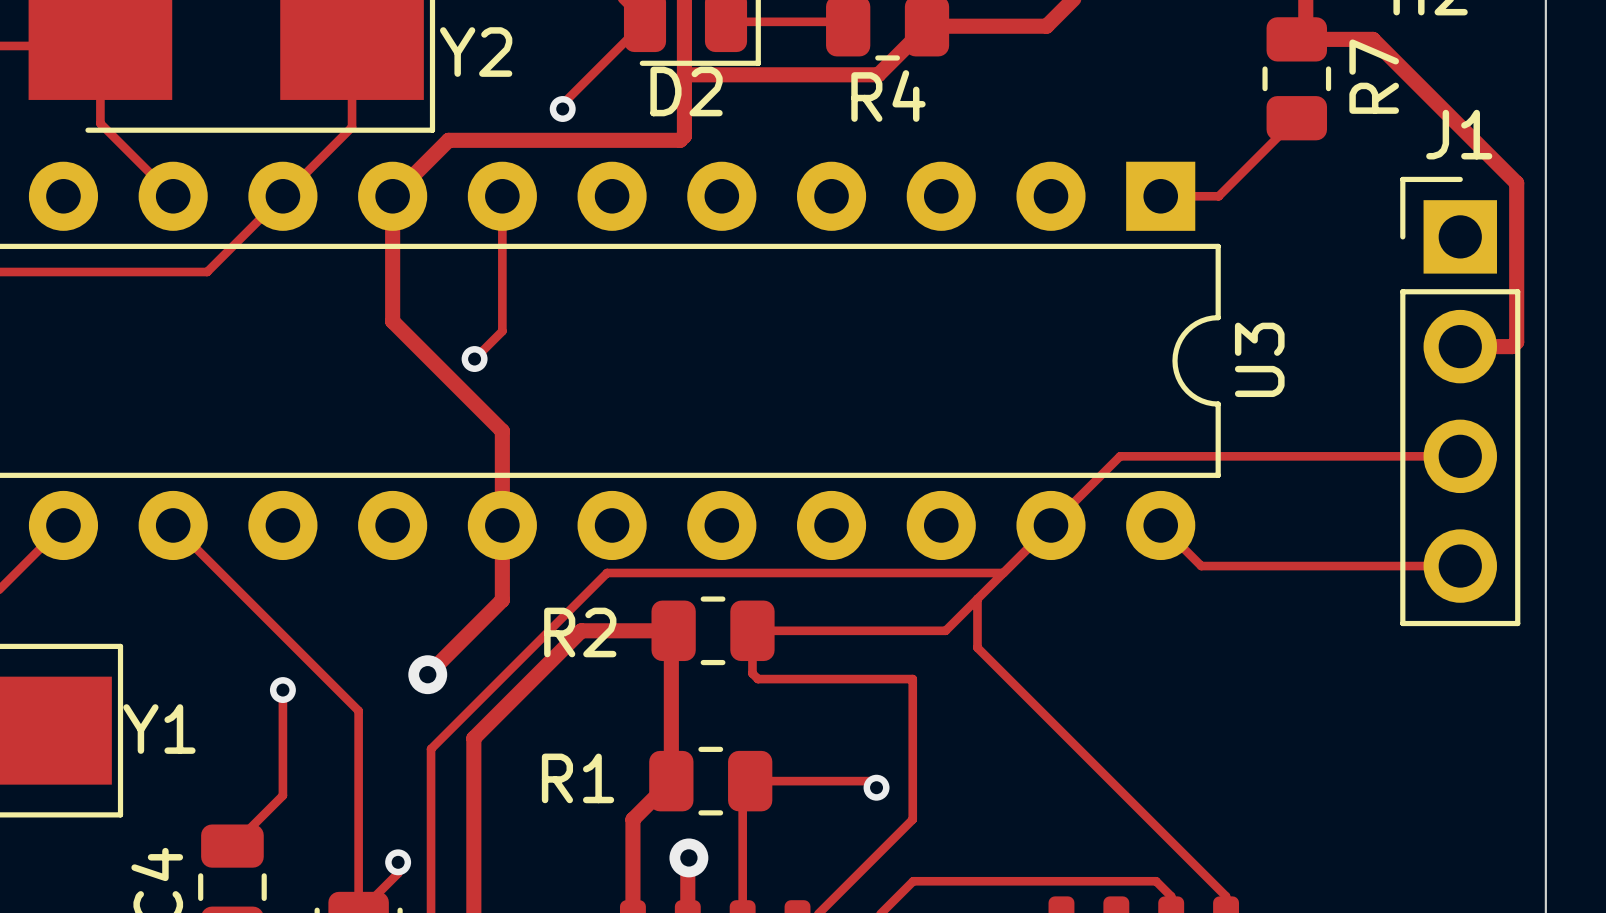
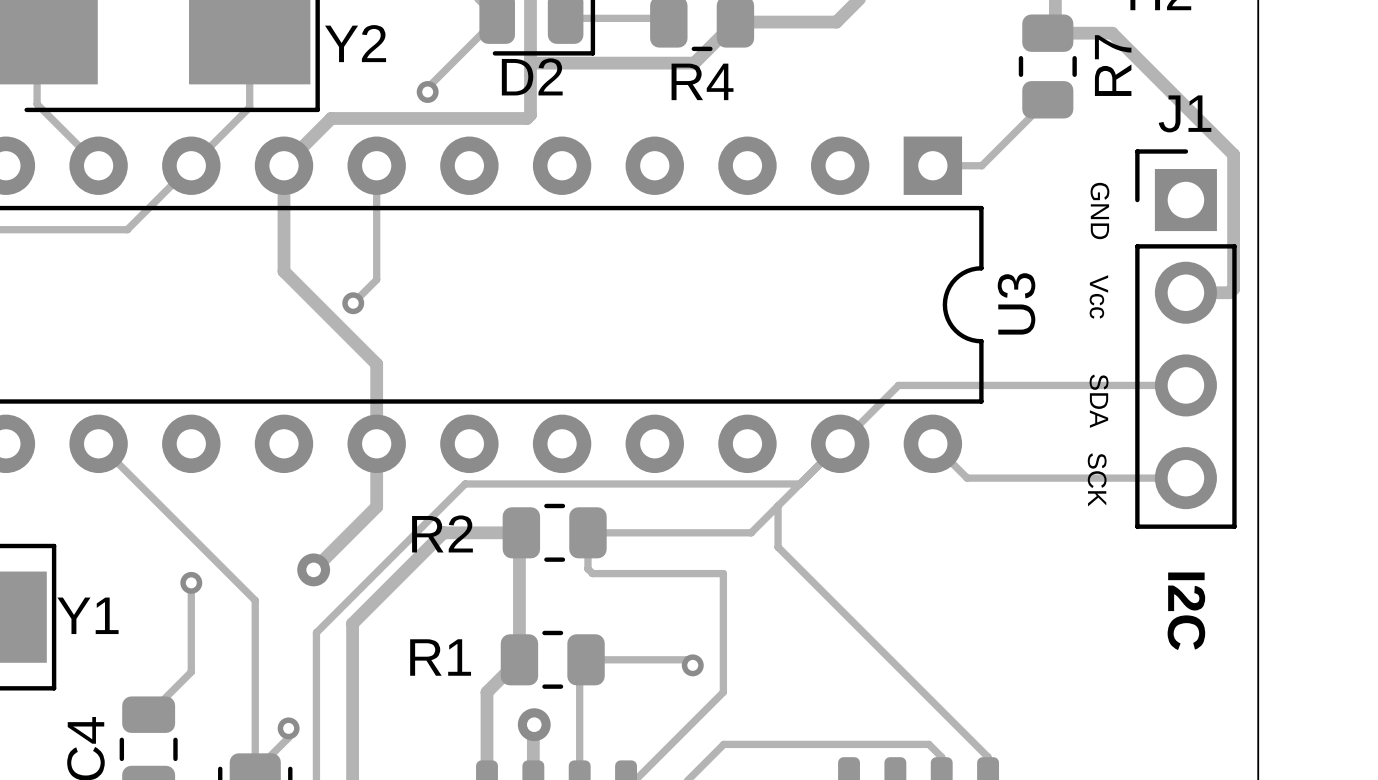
text: none -> GND (1099, 211)
text: none -> Vcc (1098, 296)
text: none -> SDA (1099, 401)
text: none -> SCK (1097, 479)
text: none -> I2C (1186, 611)

